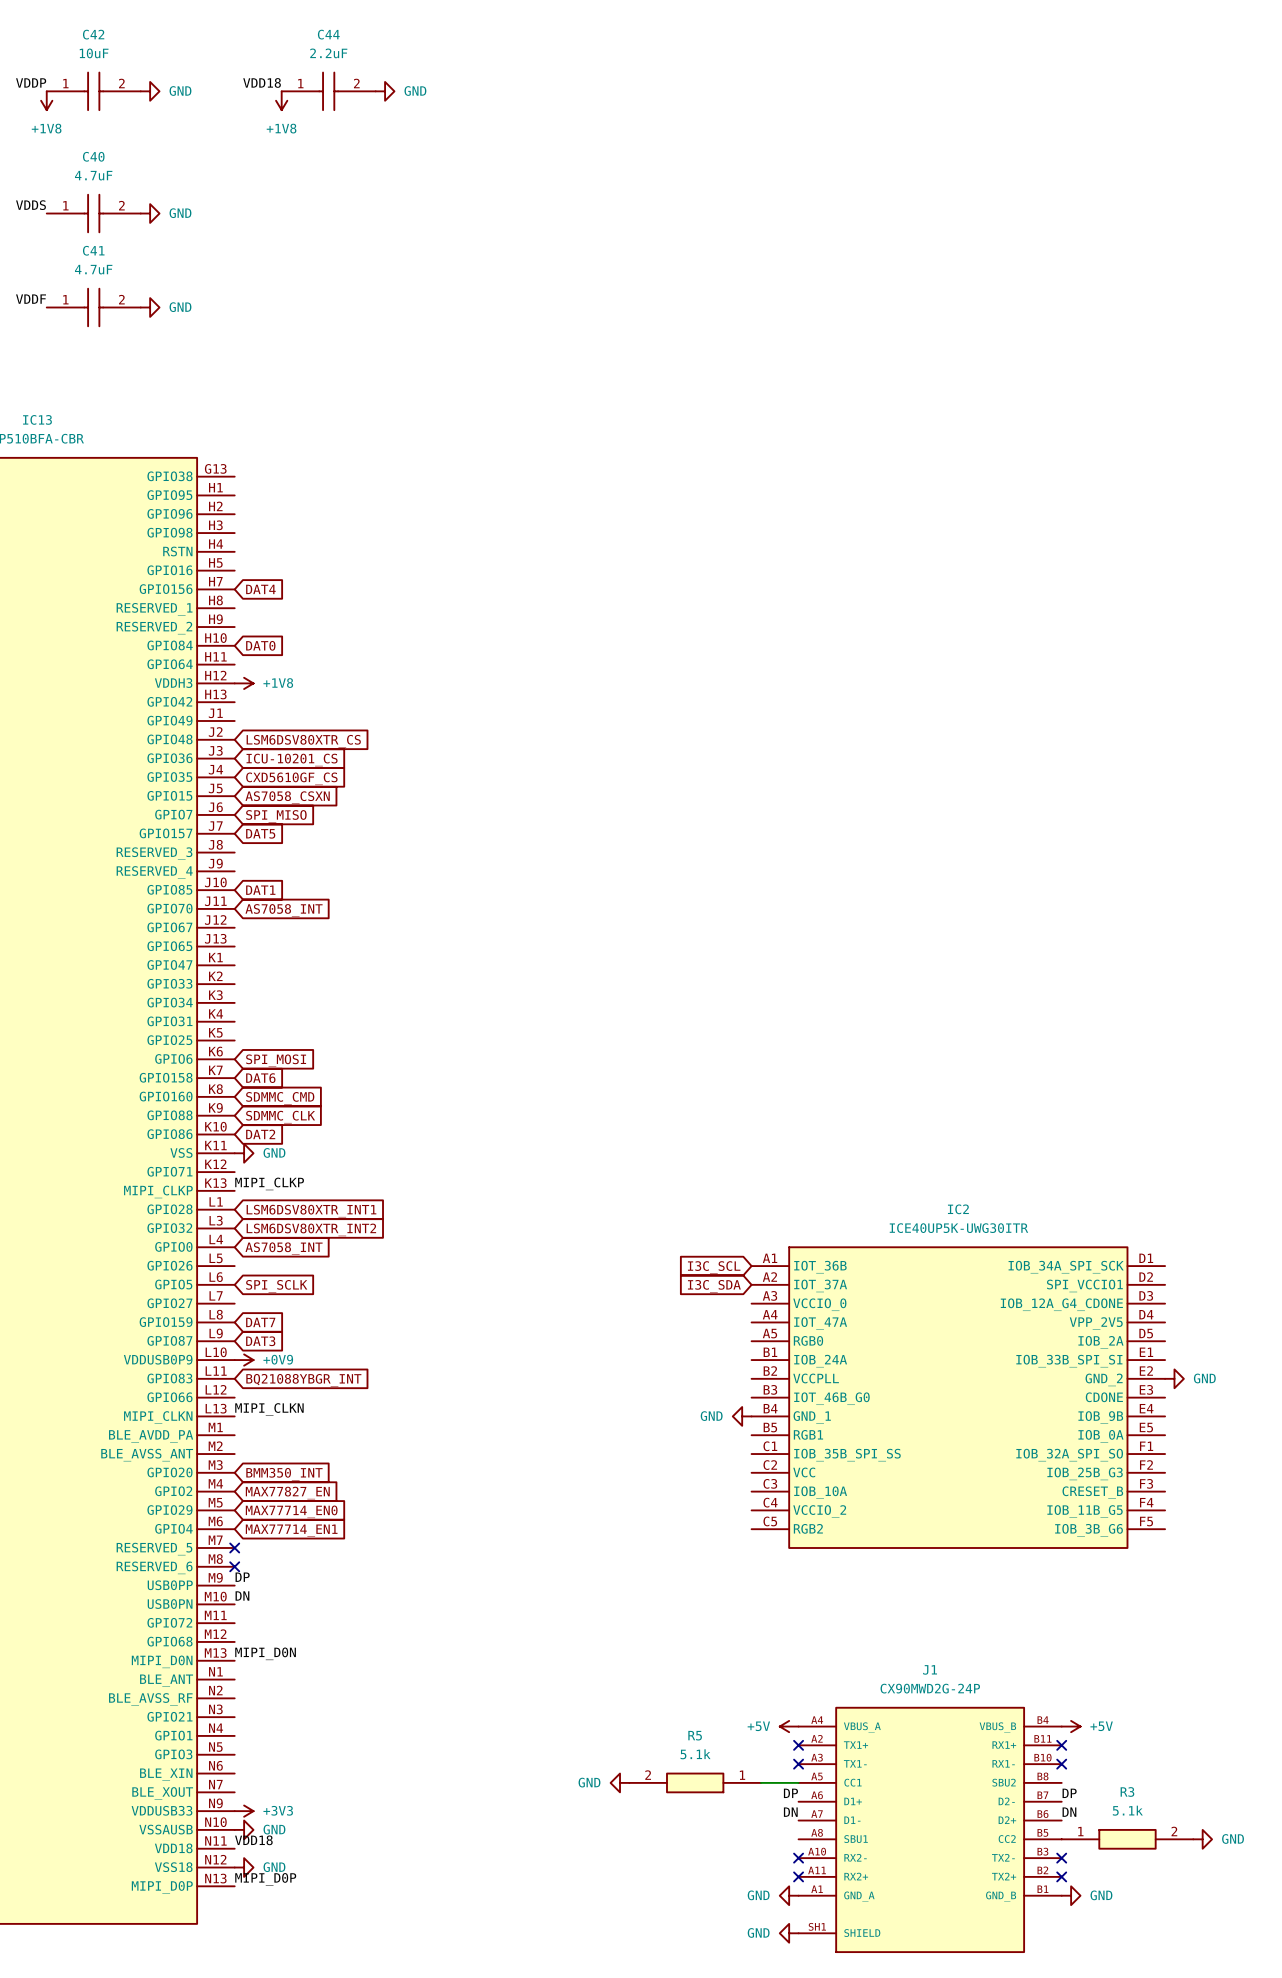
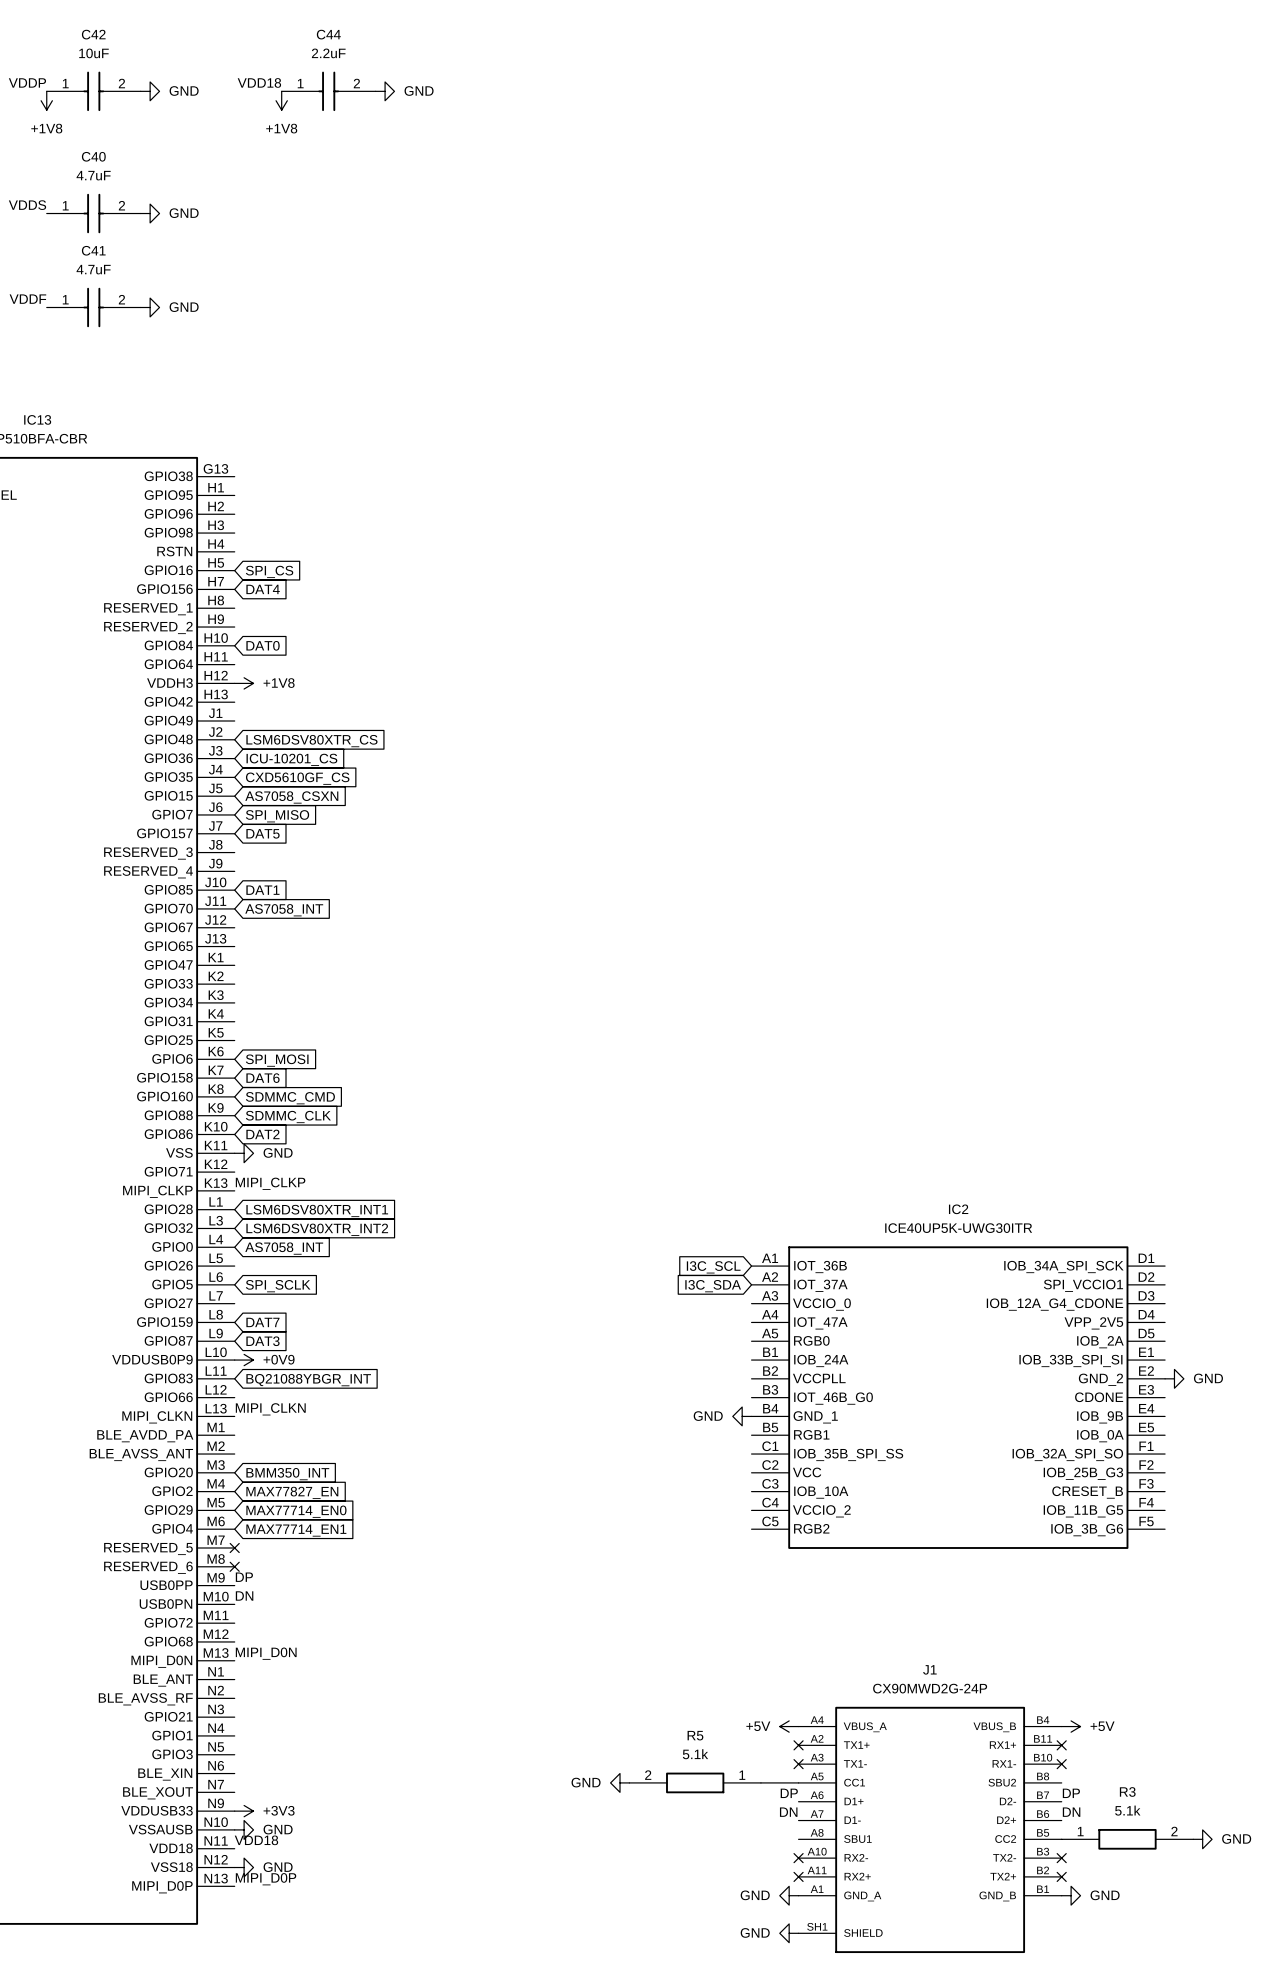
global label: none -> SPI_CS (269, 571)

